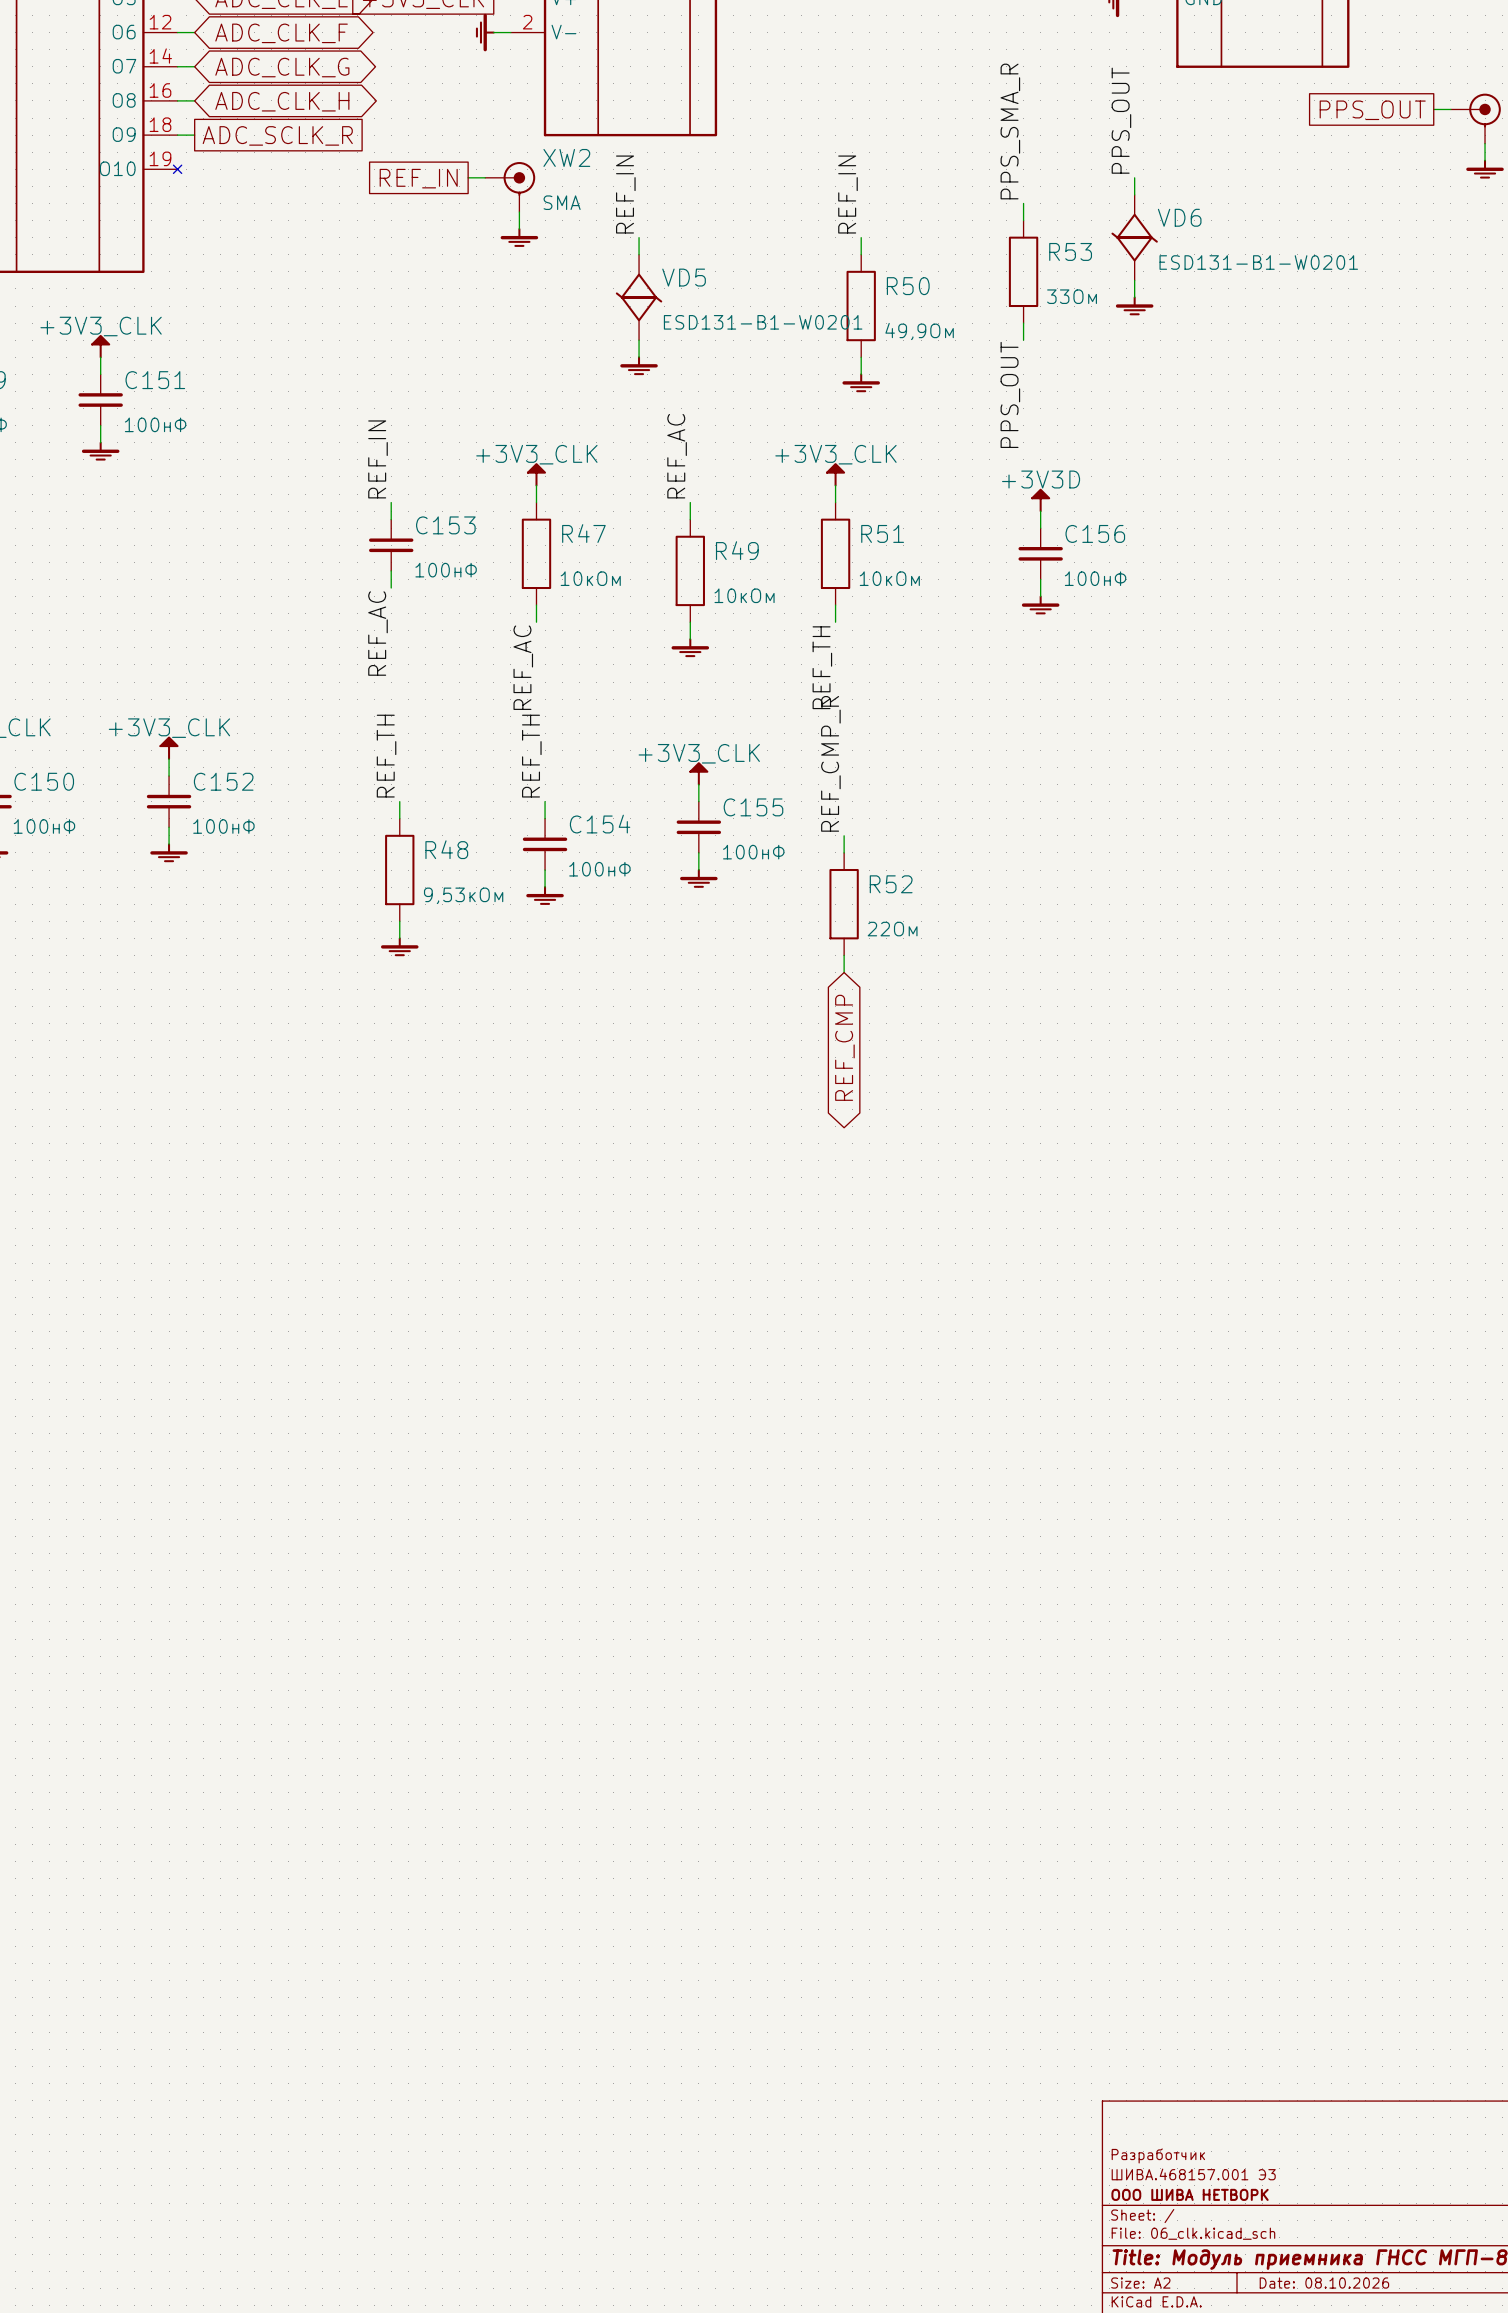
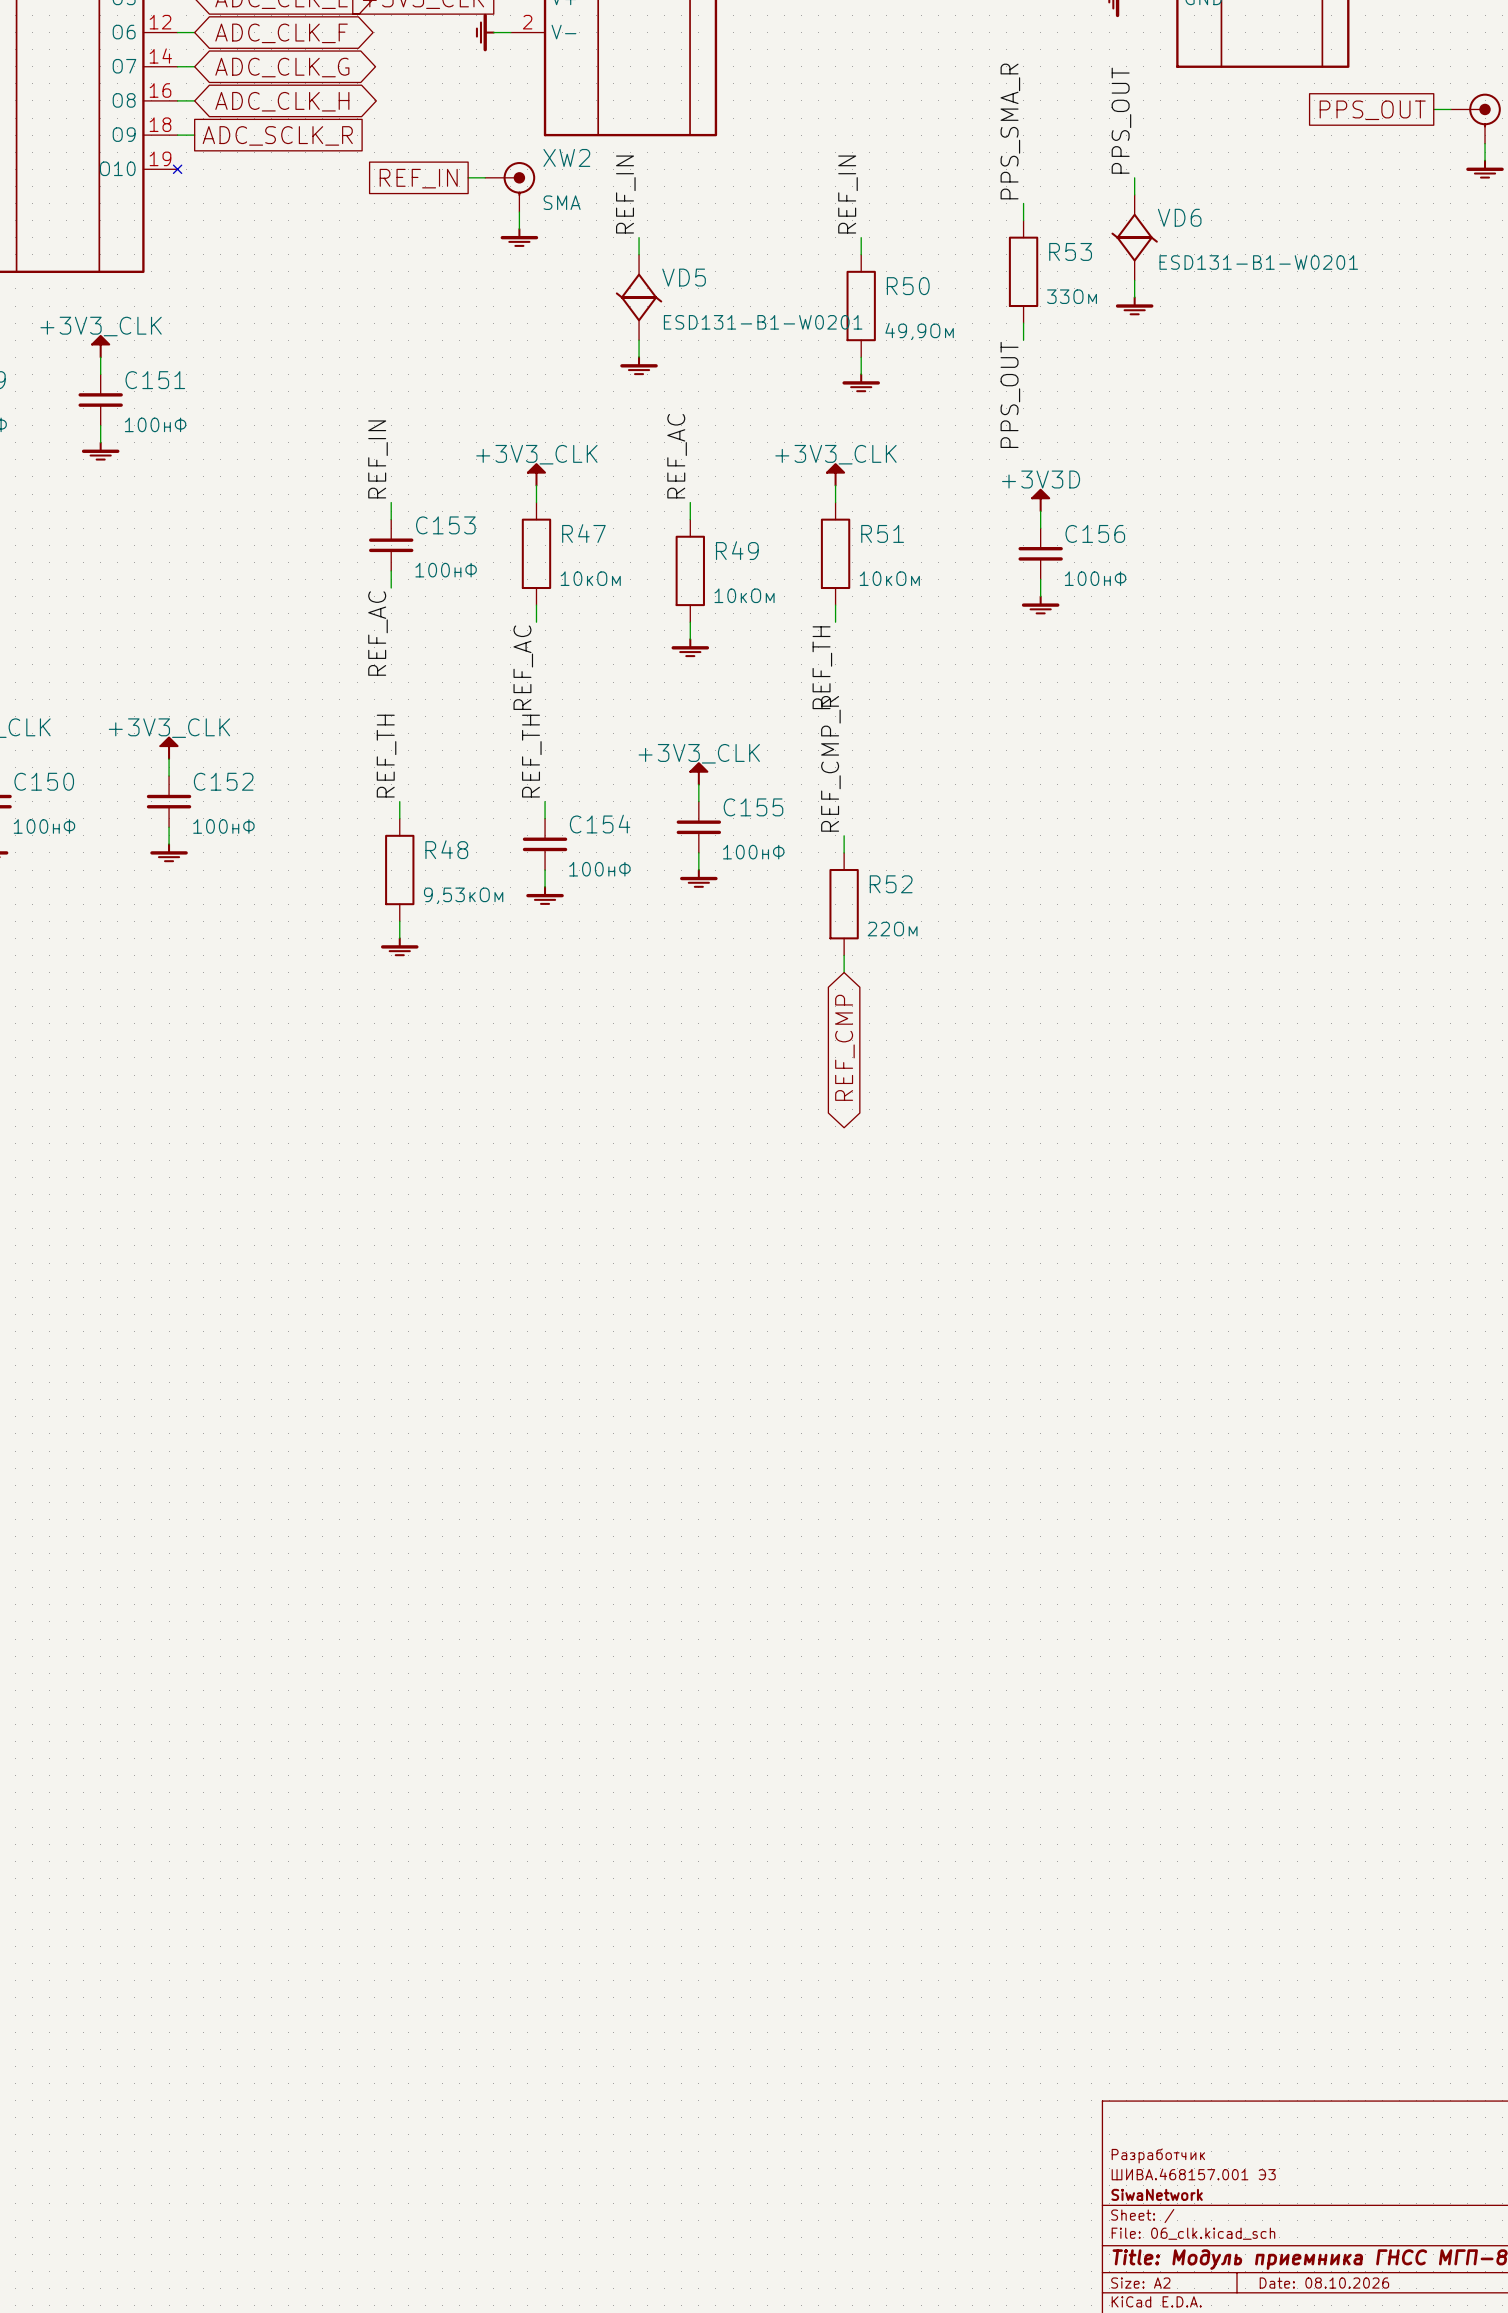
title block: ООО ШИВА НЕТВОРК (1190, 2194) -> SiwaNetwork (1157, 2194)

